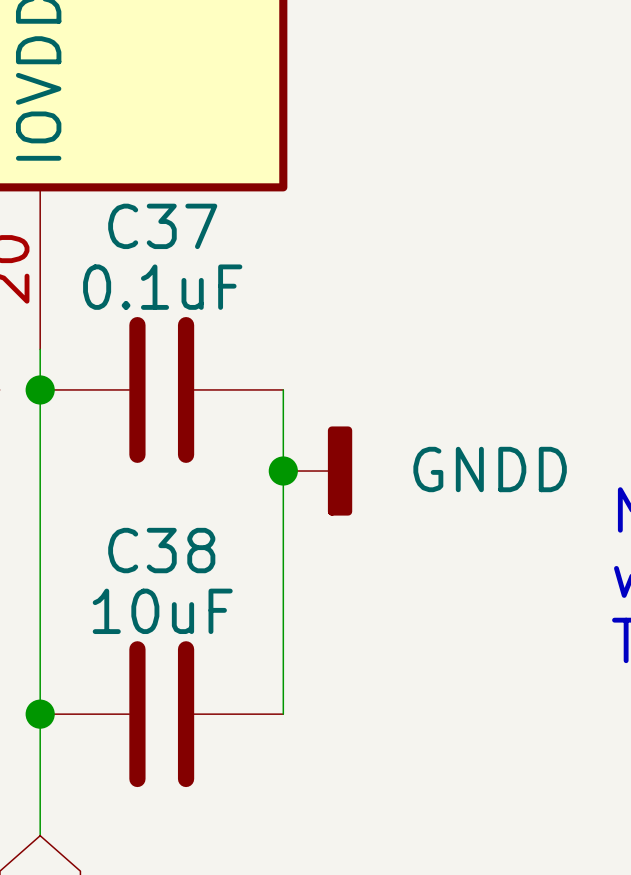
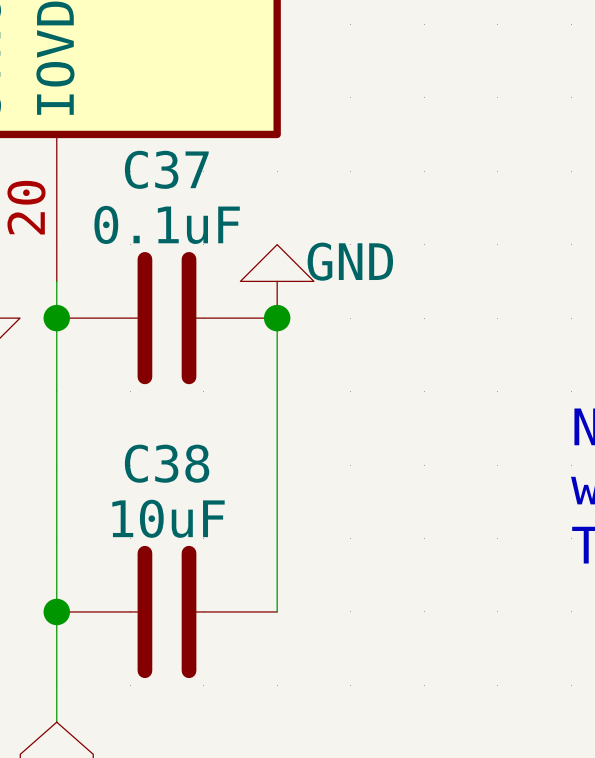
power symbol: none -> GND (277, 281)
junction position: (283, 471) -> (277, 318)
power symbol: GNDD (317, 471) -> none

